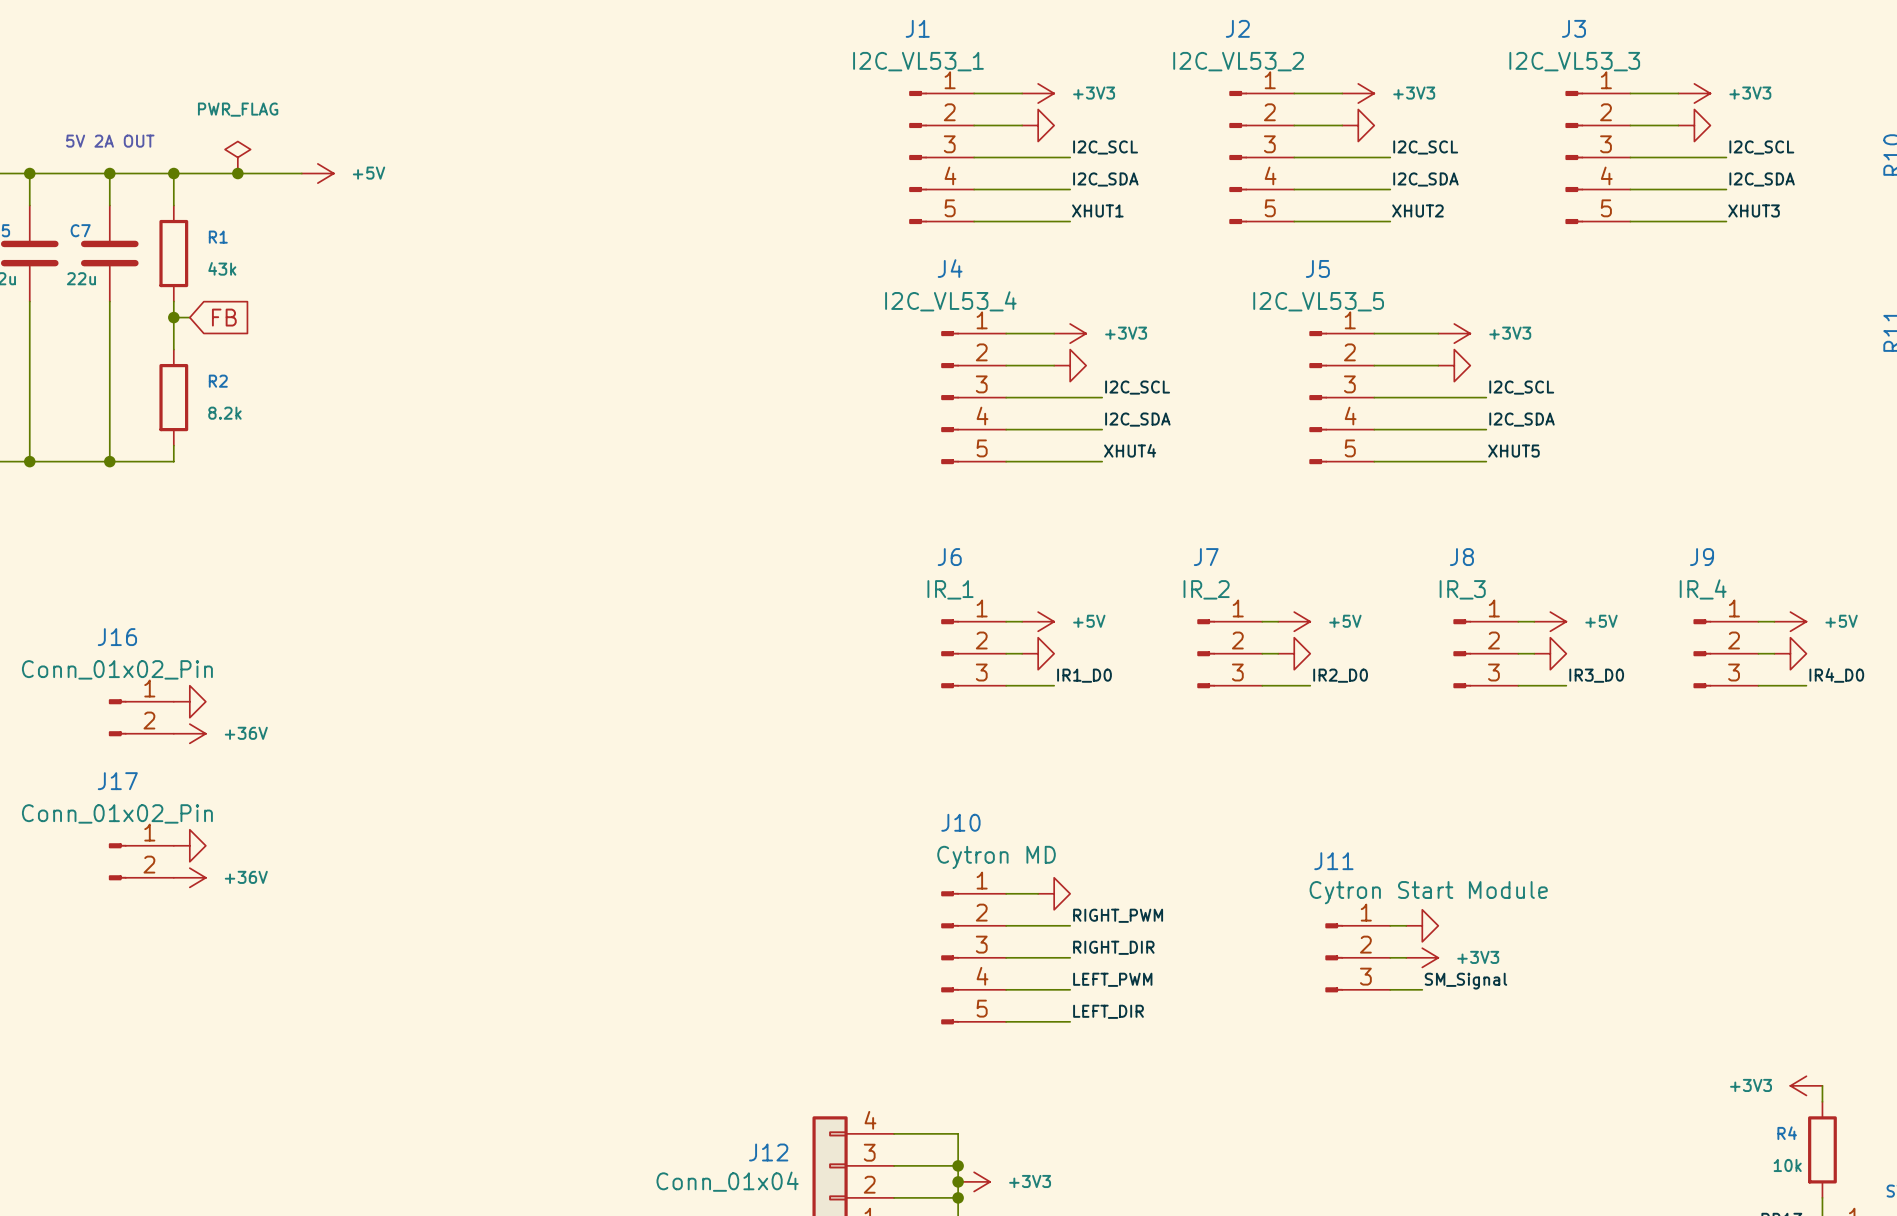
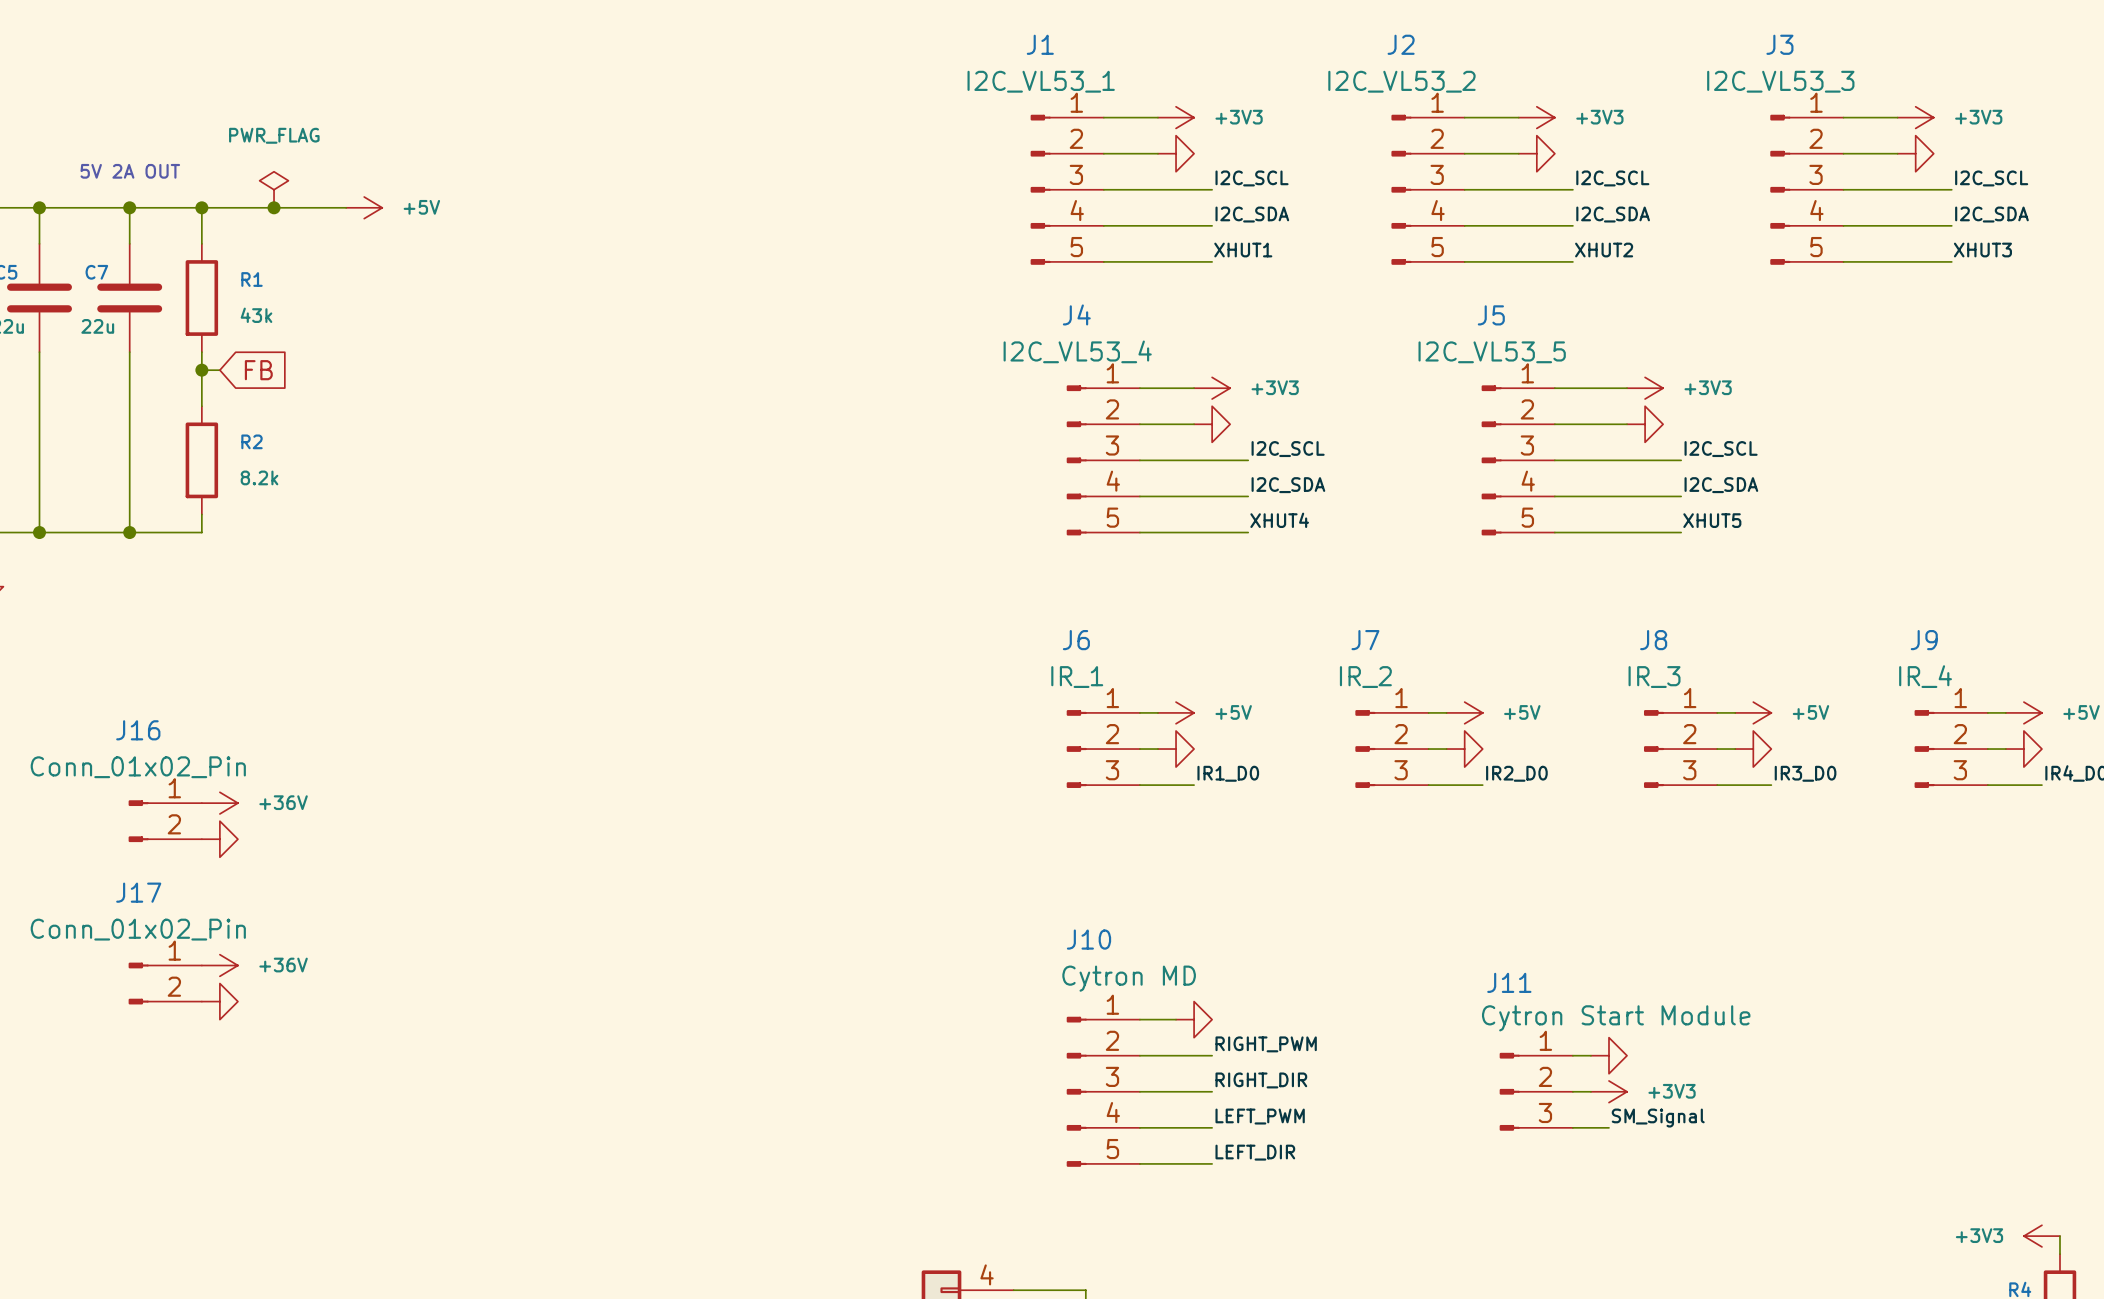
power symbol shape: [173, 685, 206, 718] -> [201, 792, 238, 814]
power symbol text: none -> +36V (283, 802)
power symbol shape: [173, 724, 206, 744] -> [201, 821, 238, 858]
power symbol text: +36V (246, 733) -> none
power symbol shape: [173, 829, 206, 862] -> [201, 954, 238, 977]
power symbol text: none -> +36V (283, 965)
power symbol shape: [173, 868, 206, 888] -> [201, 983, 238, 1020]
power symbol text: +36V (246, 877) -> none

